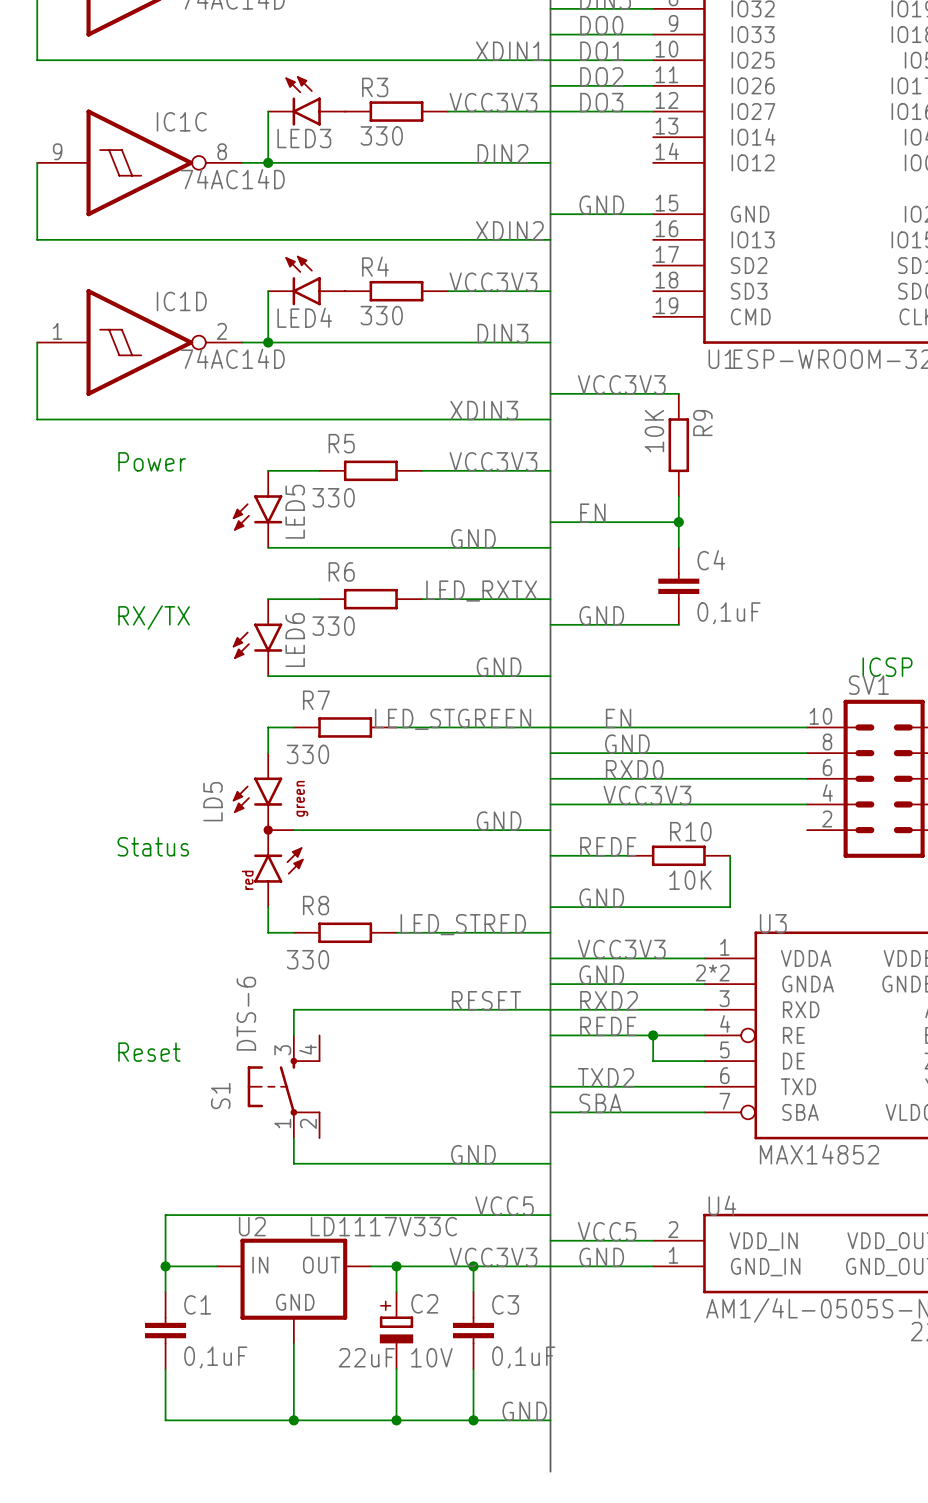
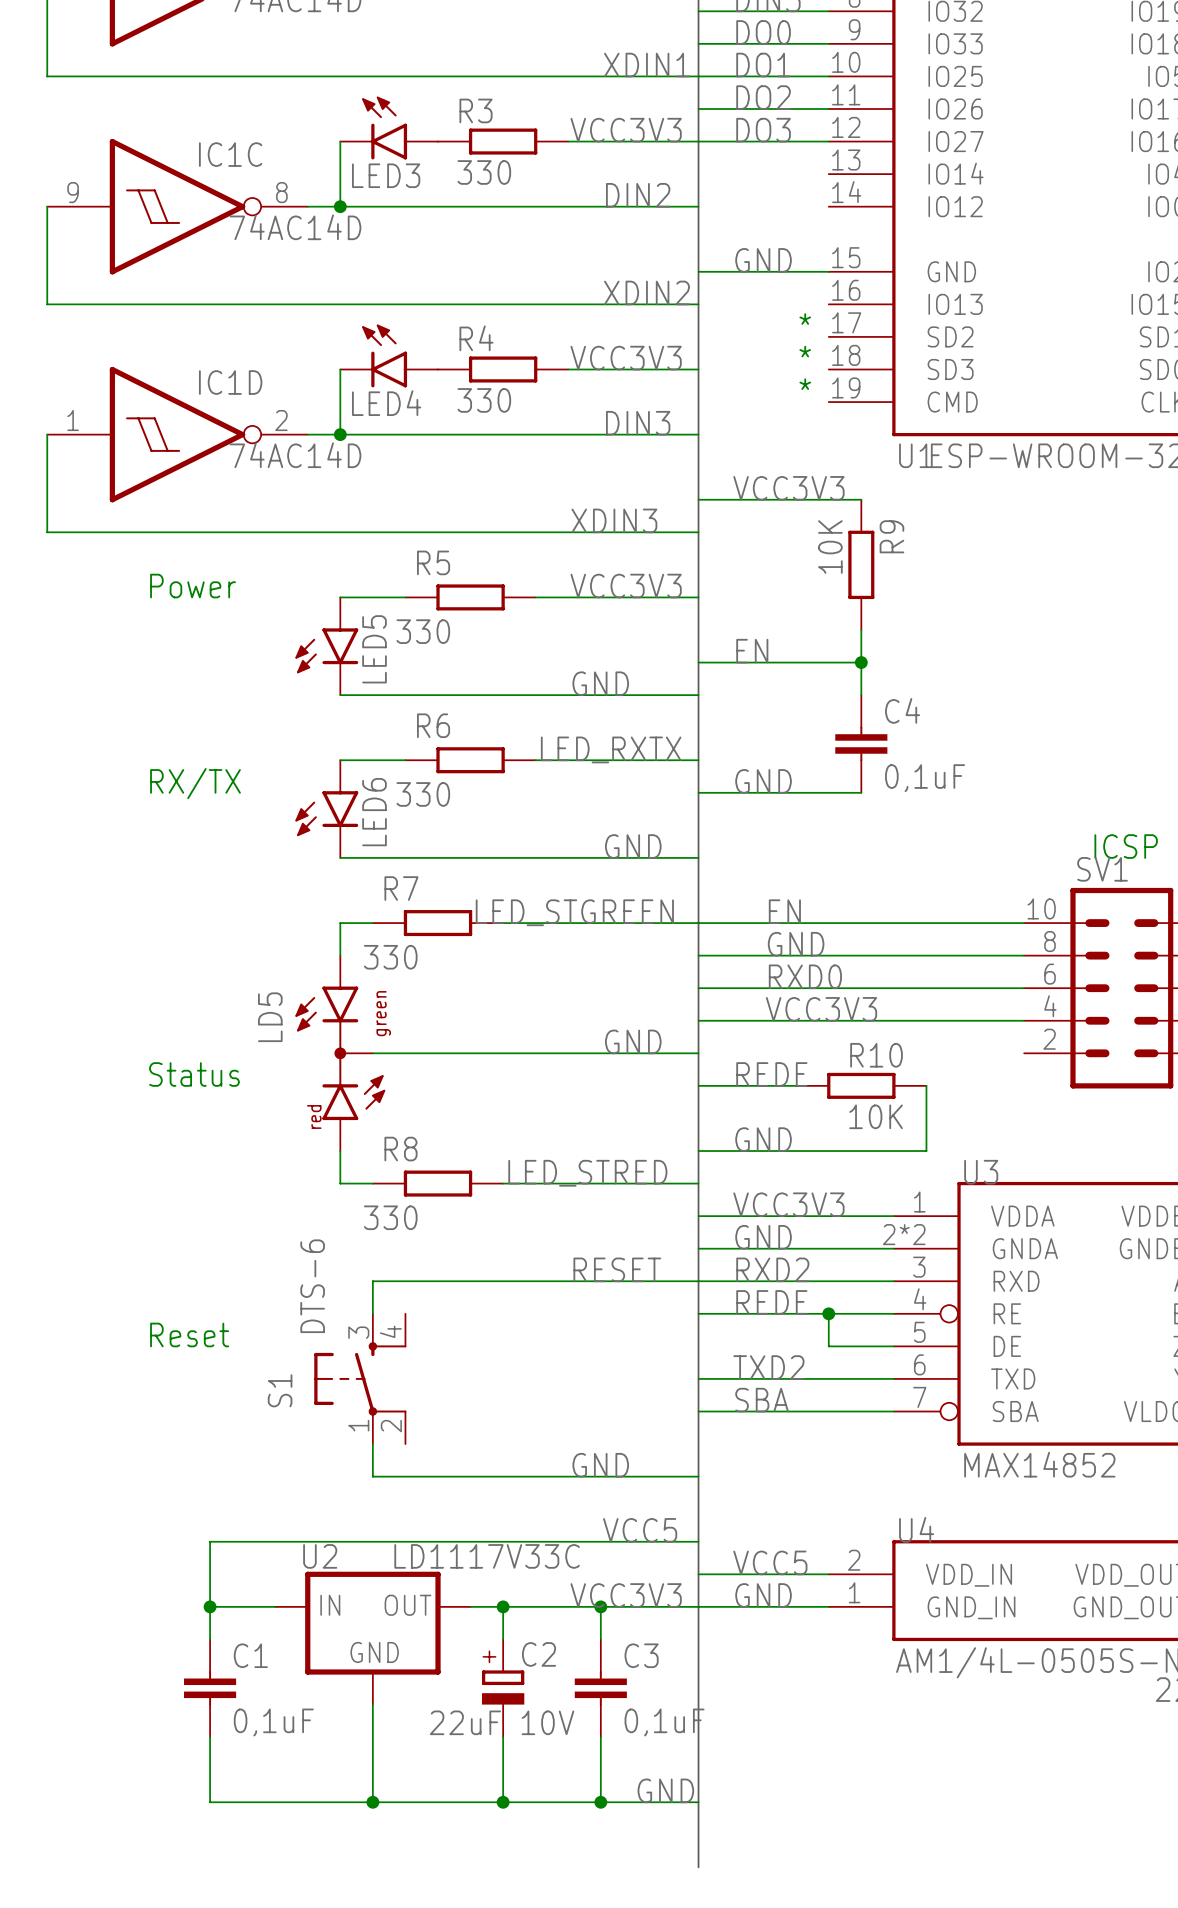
text: none -> * (805, 319)
text: none -> * (805, 351)
text: none -> * (805, 384)

